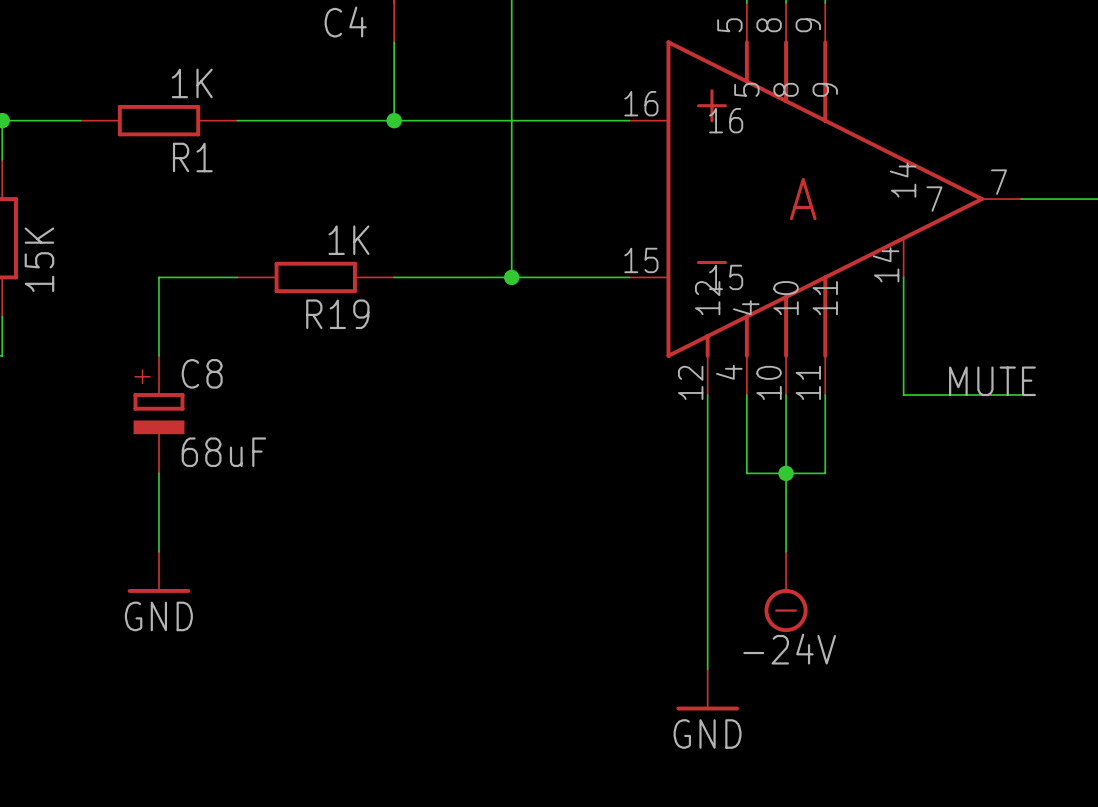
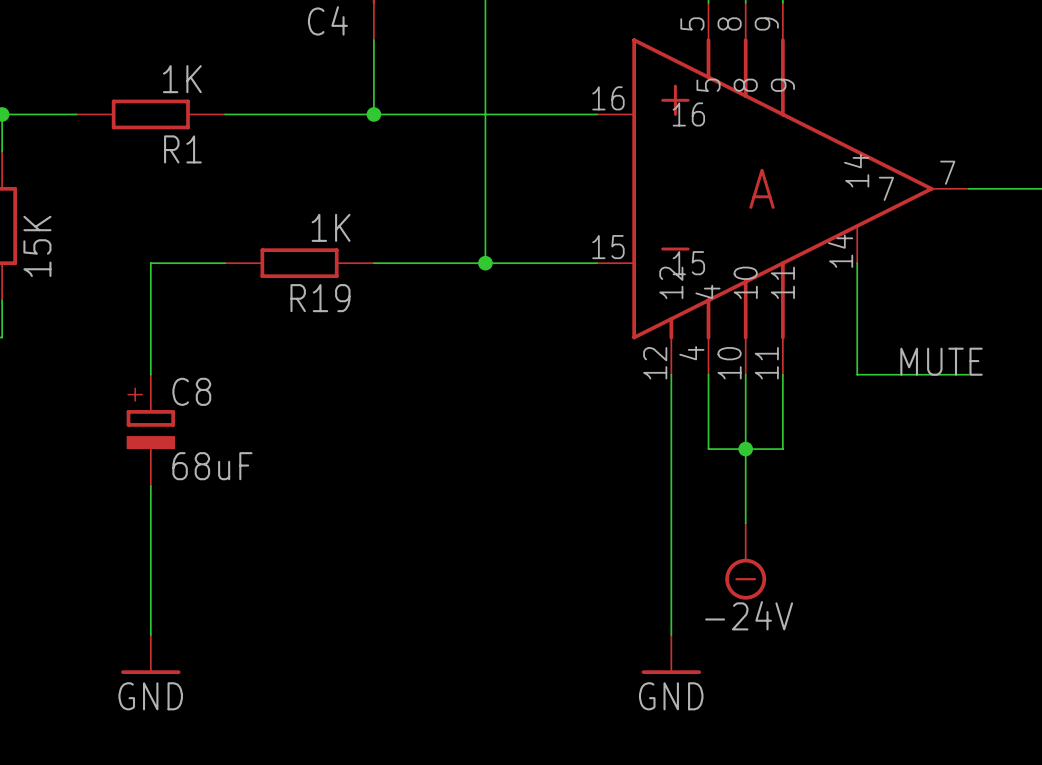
C8 position: (158, 414) -> (150, 430)
wire: none -> (150, 523) (150, 634)
power symbol position: GND (158, 572) -> GND (150, 654)

